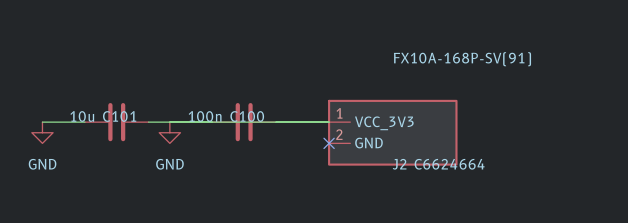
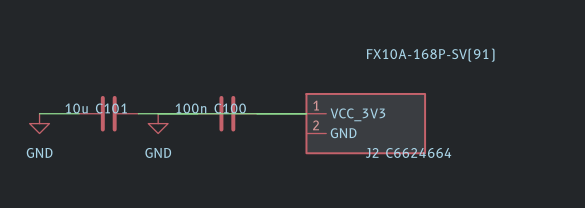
no-connect mark: (329, 143) -> none

